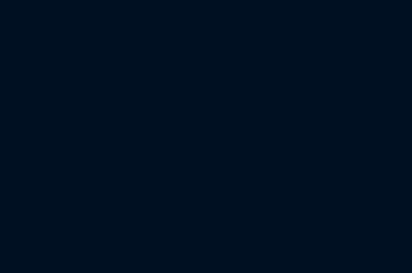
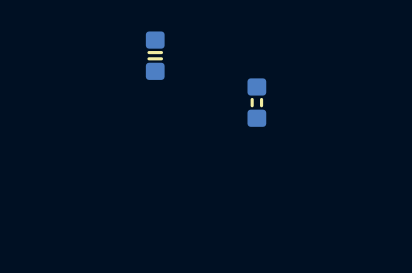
part: none -> (155, 55)
part: none -> (256, 102)

